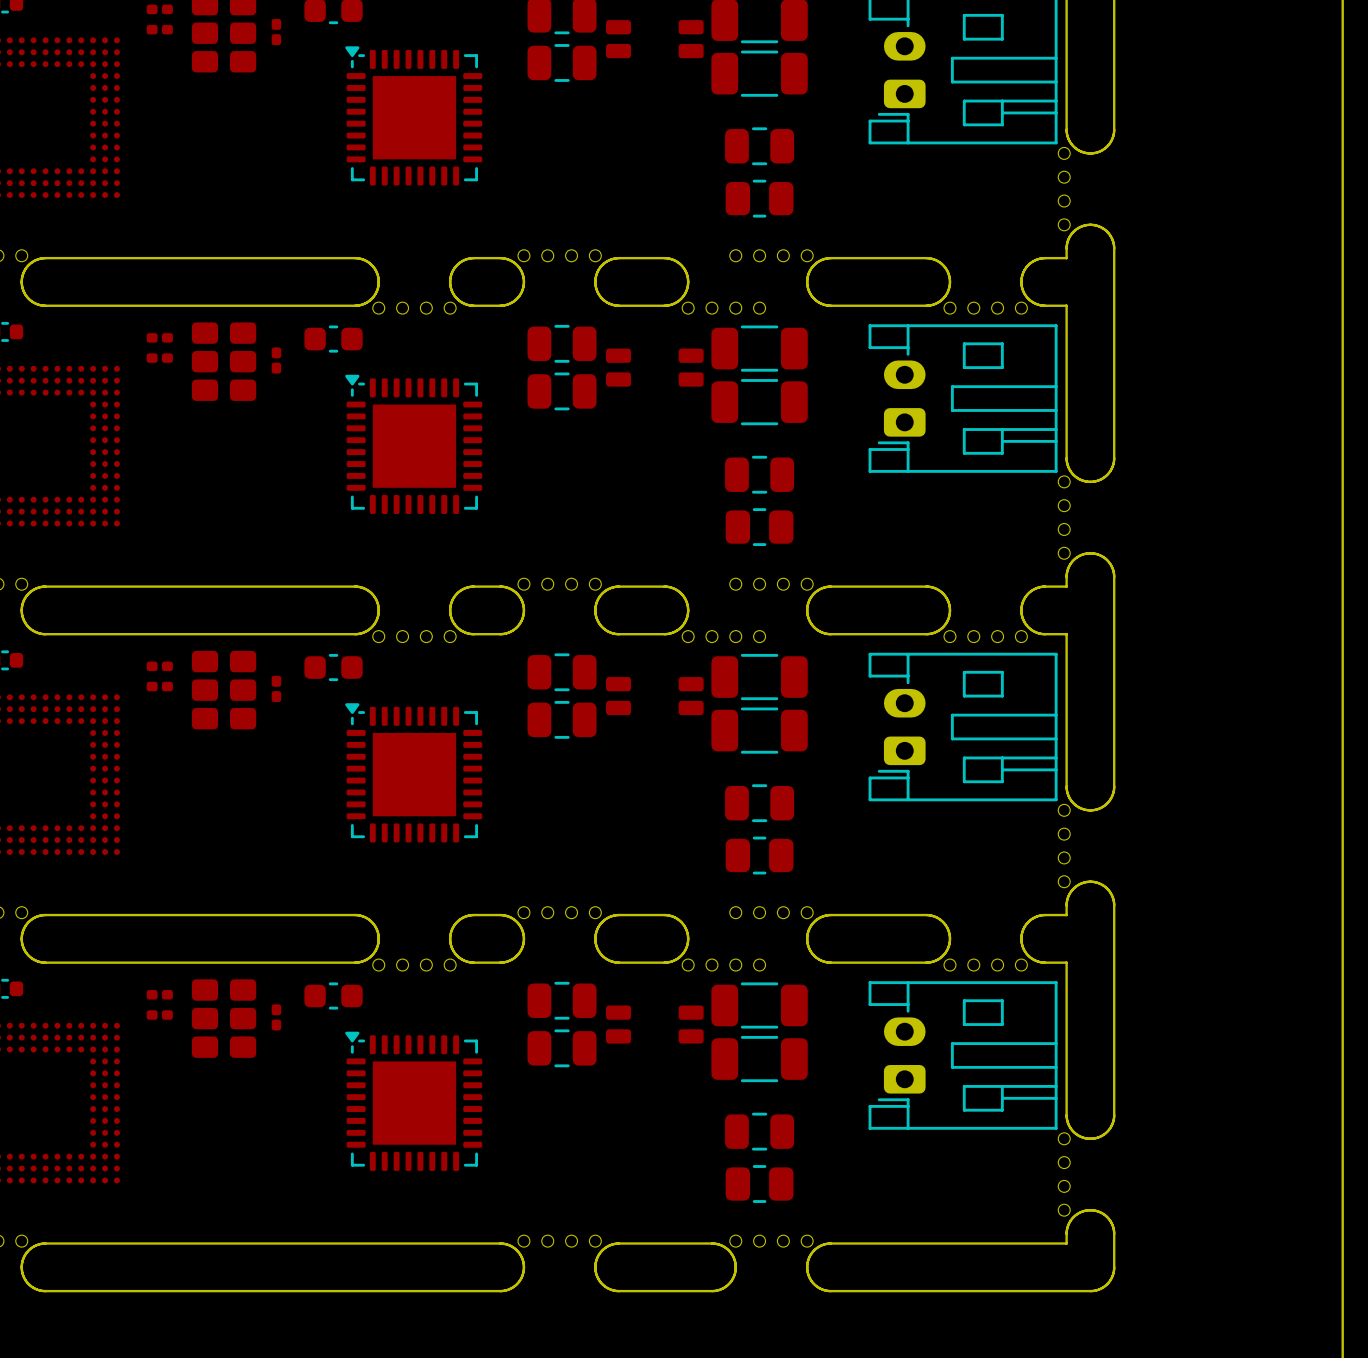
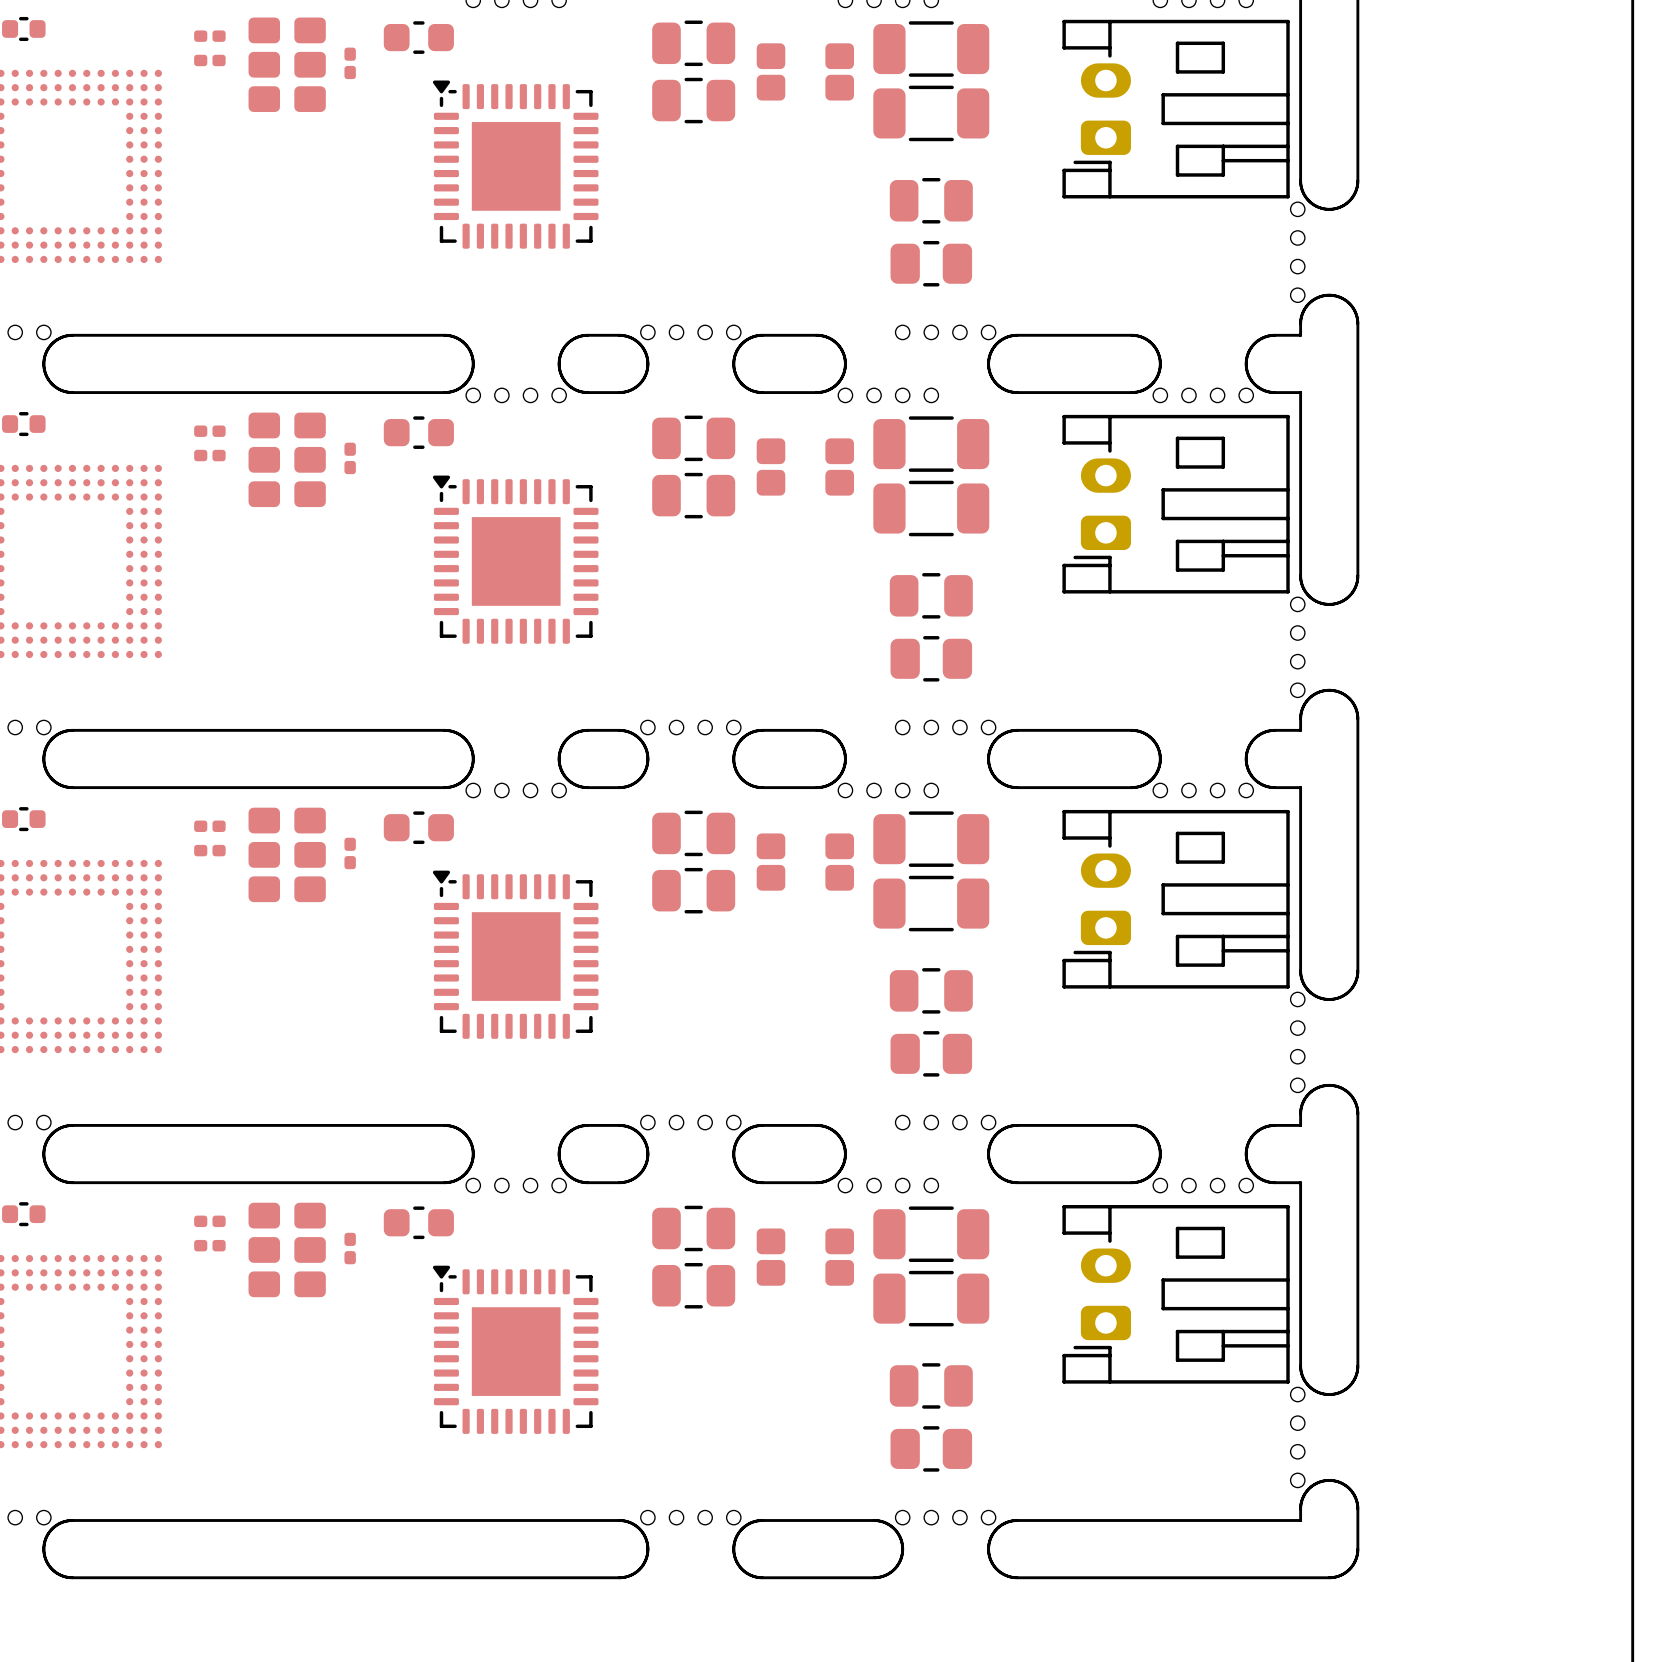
part footprint: [606, 20, 704, 59] -> [756, 43, 855, 101]
part footprint: [345, 46, 483, 186] -> [432, 80, 599, 249]
part footprint: [606, 348, 704, 387] -> [756, 438, 855, 496]
part footprint: [345, 374, 483, 515] -> [432, 475, 599, 644]
part footprint: [606, 677, 704, 716] -> [756, 833, 855, 891]
part footprint: [345, 703, 483, 843] -> [432, 870, 599, 1039]
part footprint: [606, 1005, 704, 1044] -> [756, 1228, 855, 1286]
part footprint: [345, 1031, 483, 1171] -> [432, 1265, 599, 1434]

